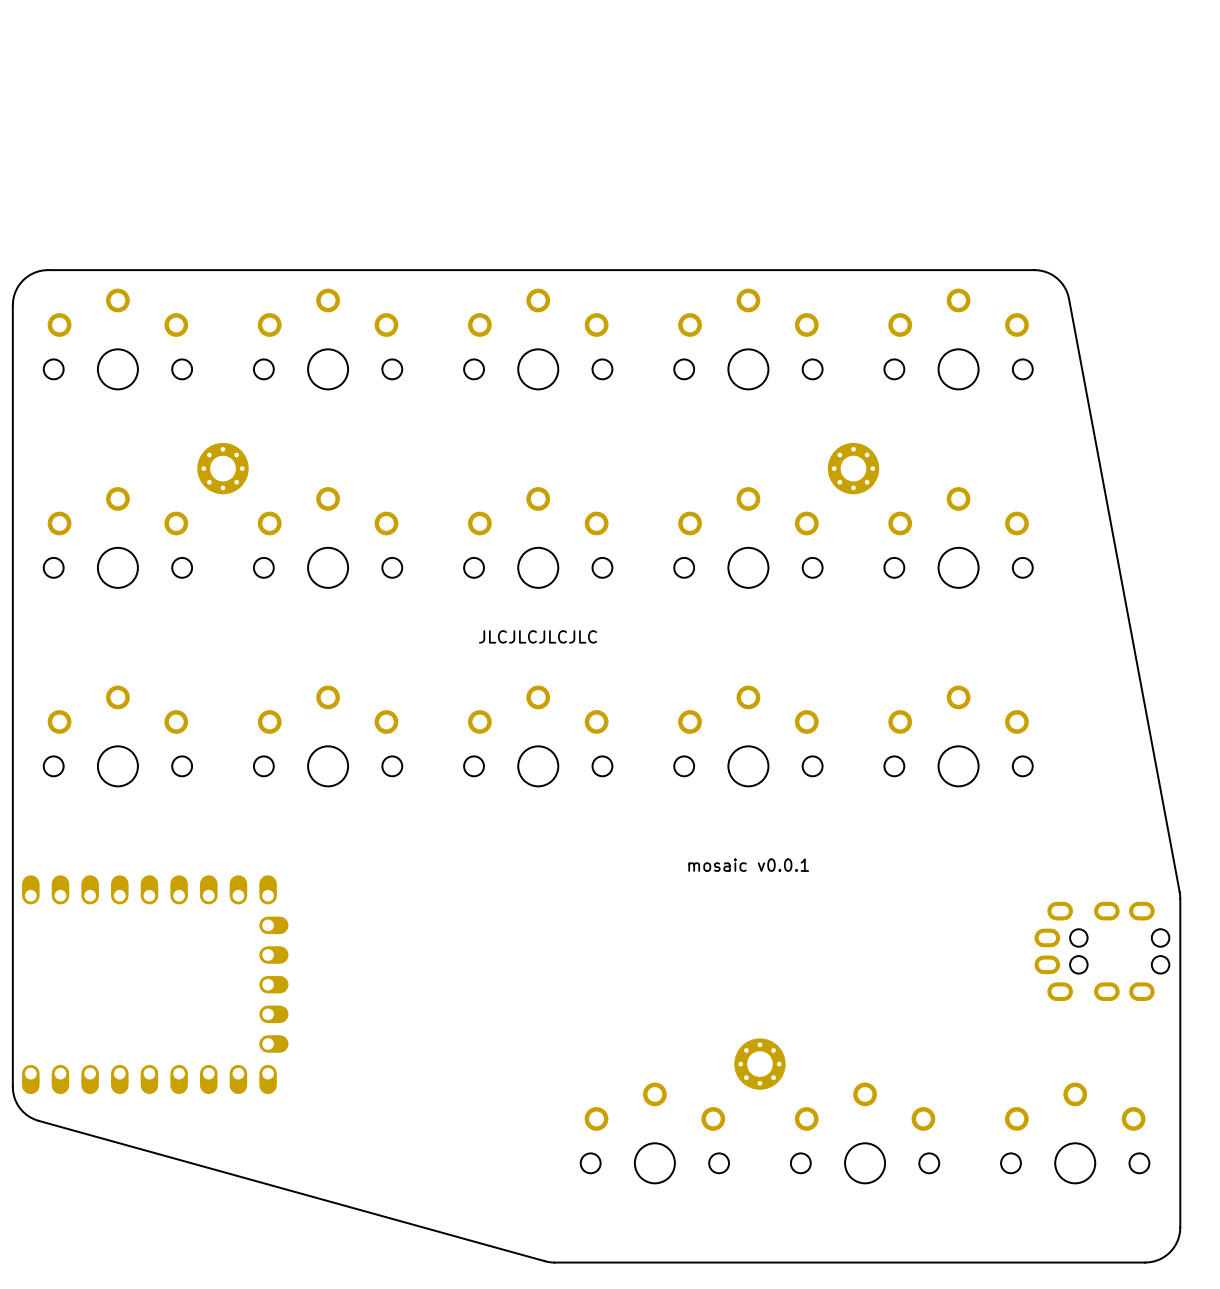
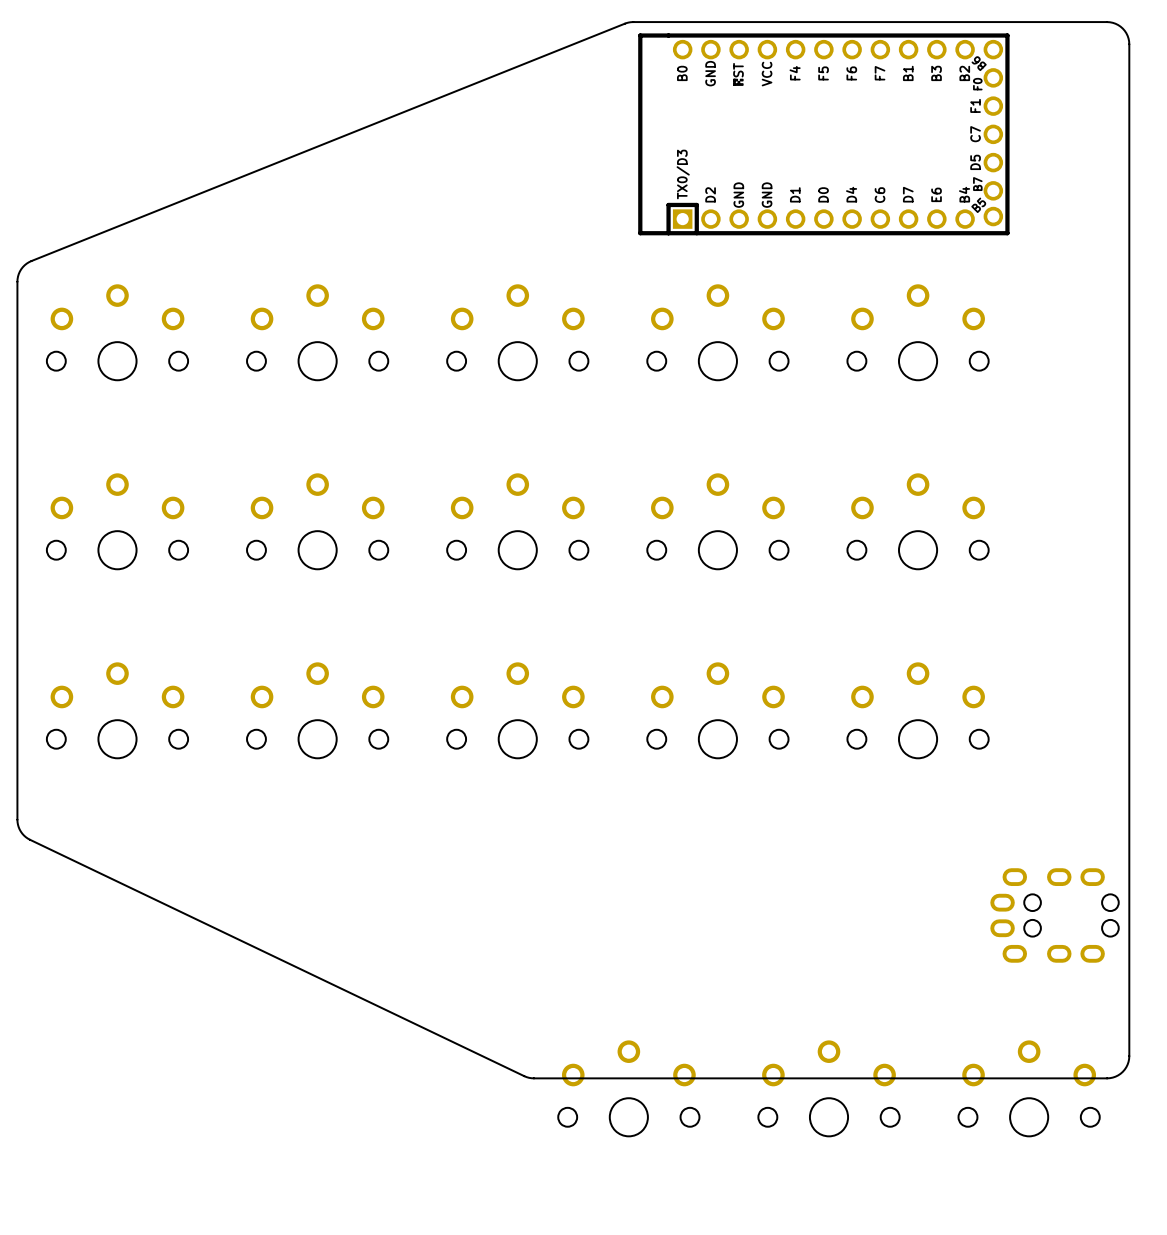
part: none -> (823, 134)
board edge: (12, 305) (15, 291) (23, 280) (34, 272) (47, 270) (1034, 270) (1046, 272) (1056, 278) (1064, 287) (1069, 298) (1180, 895) (1179, 1236) (1173, 1248) (1166, 1255) (1158, 1259) (1145, 1262) (552, 1262) (38, 1120) (22, 1111) (17, 1104) (13, 1091) (12, 850) -> (17, 300) (18, 273) (22, 267) (31, 261) (629, 22) (1107, 22) (1120, 26) (1128, 38) (1129, 1056) (1127, 1064) (1120, 1073) (1107, 1078) (529, 1077) (30, 839) (20, 831) (17, 819)
part: (223, 468) -> none
part: (853, 468) -> none
text: JLCJLCJLCJLC (537, 636) -> none
text: mosaic v0.0.1 (748, 865) -> none
part: (155, 984) -> none
part: (759, 1064) -> none

